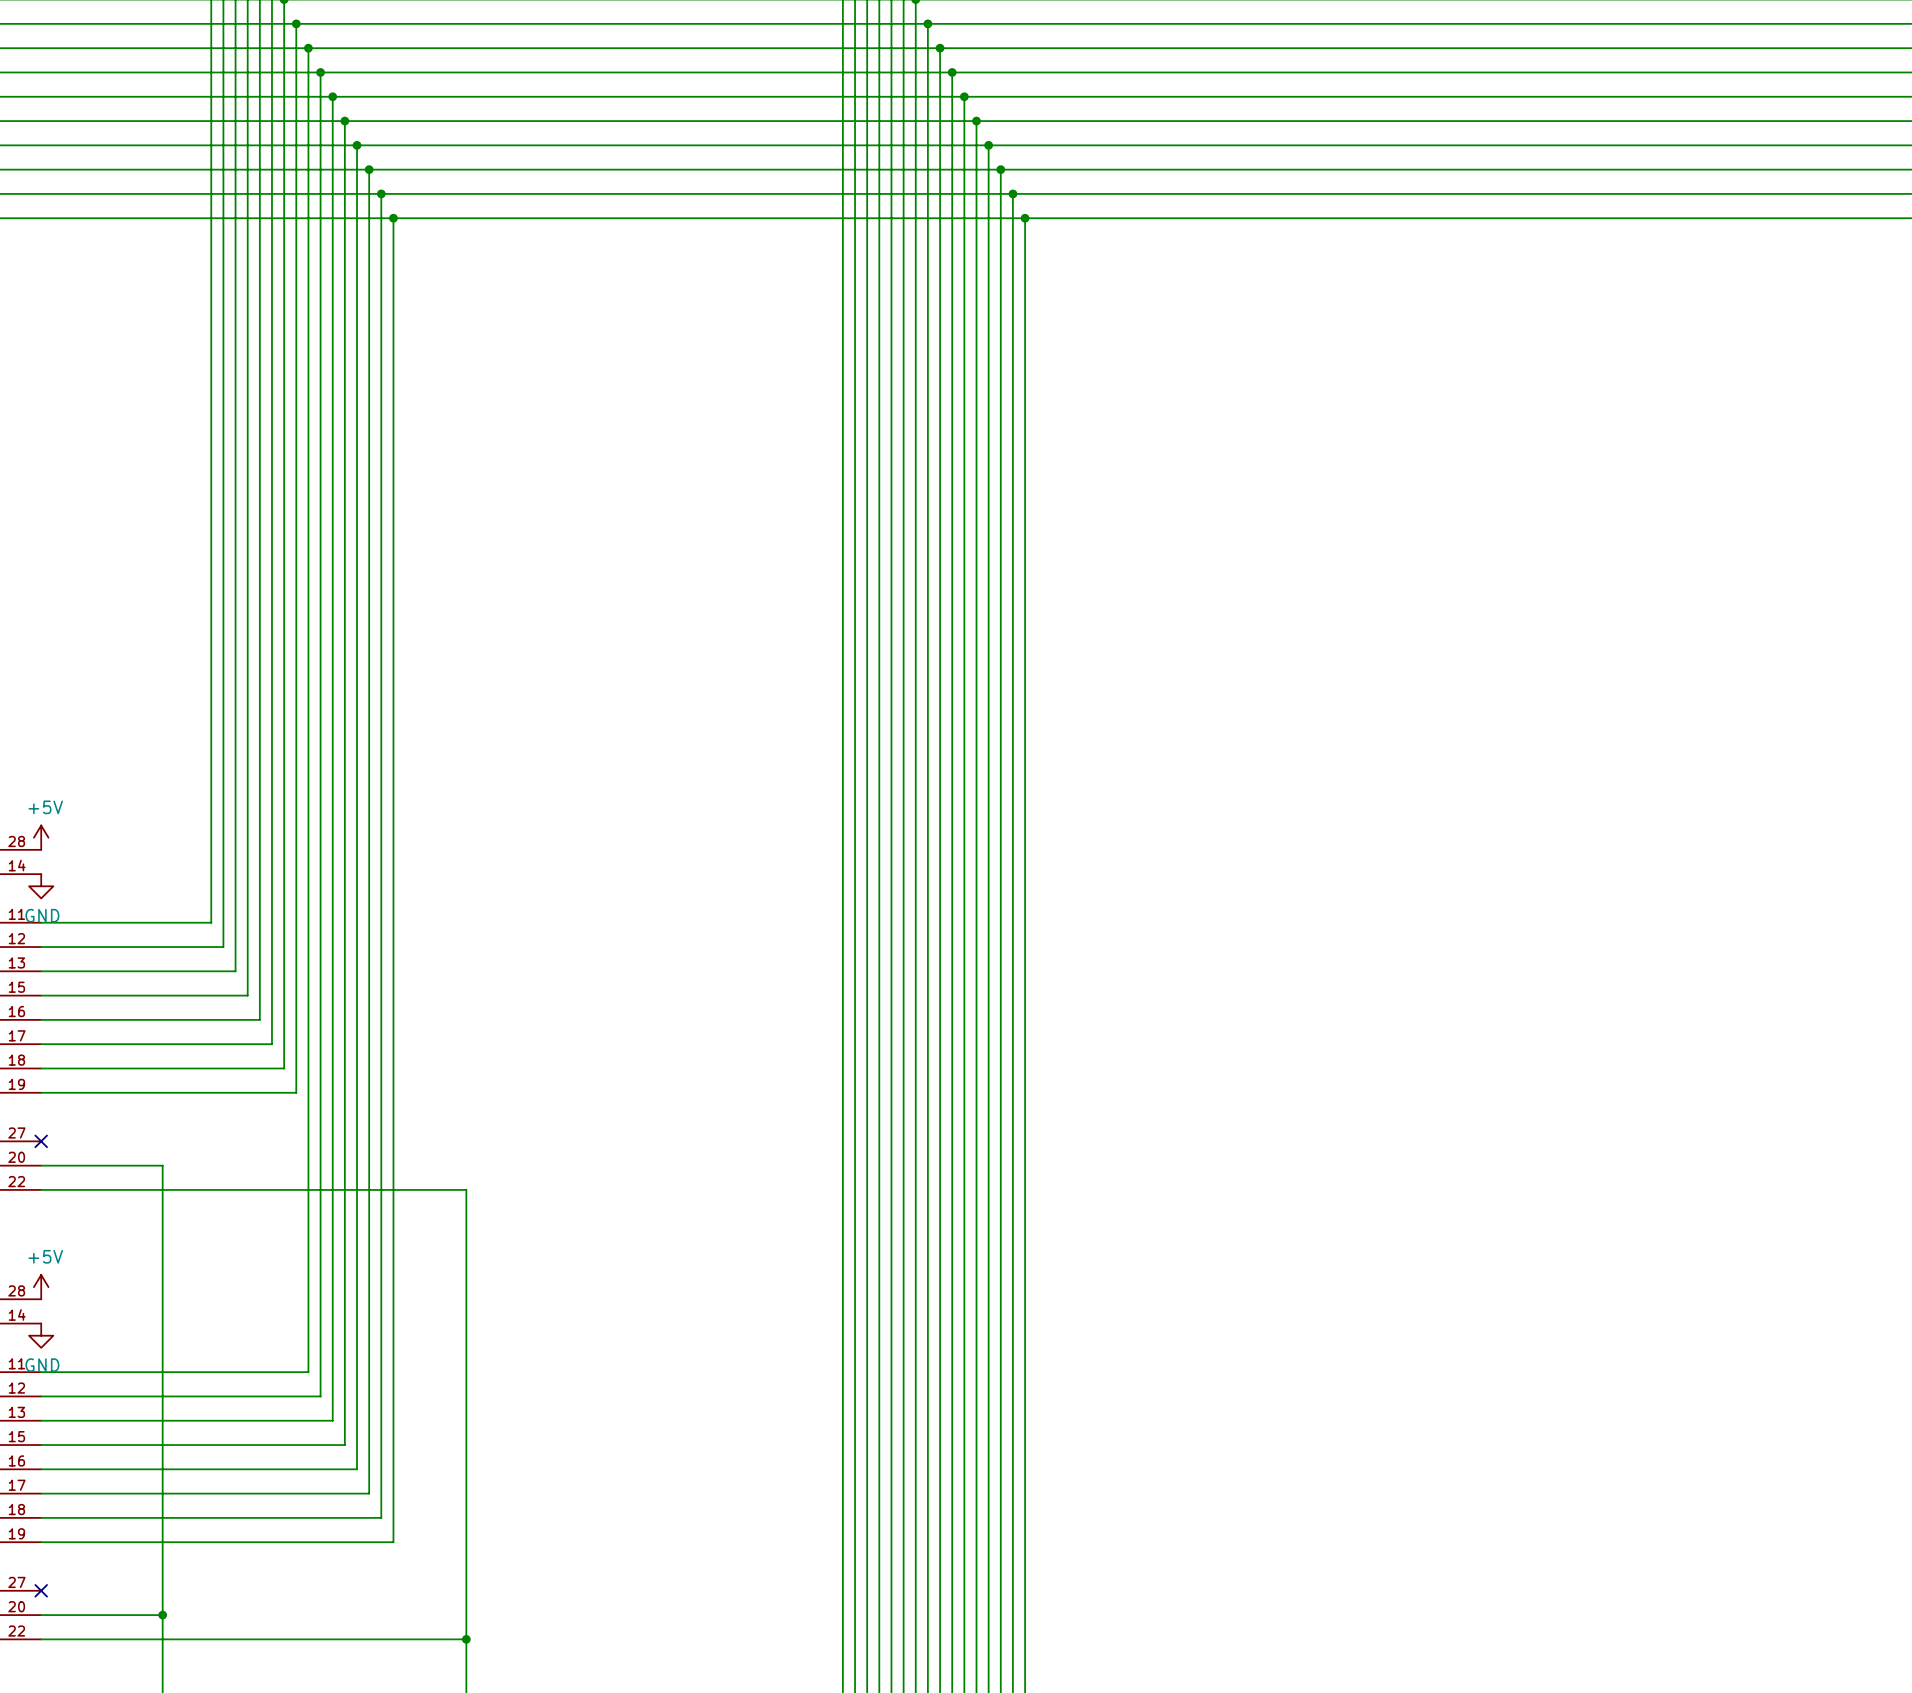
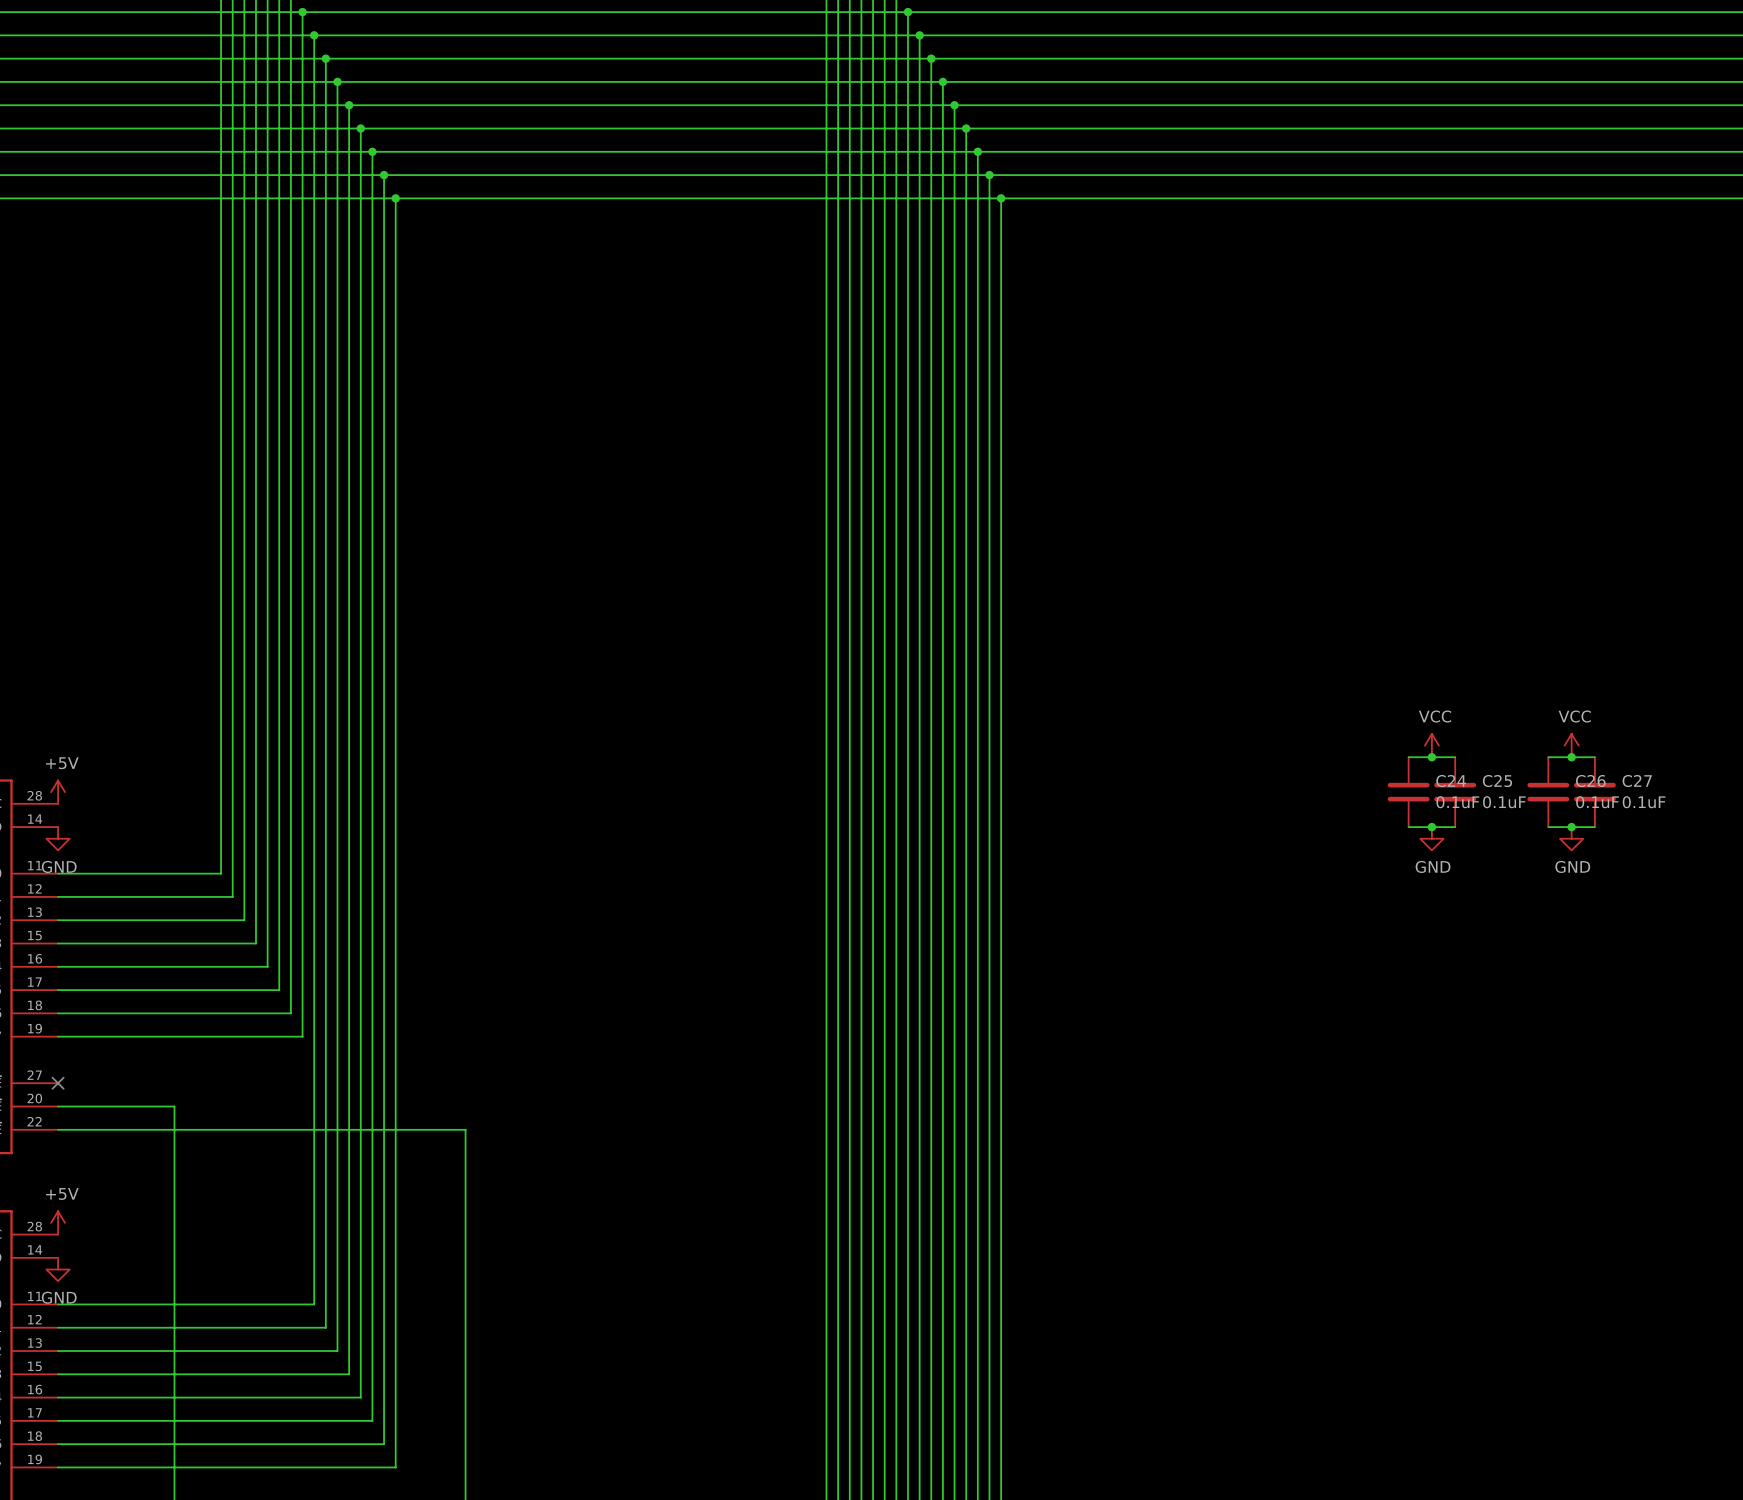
power symbol: none -> VCC (1431, 745)
power symbol: none -> VCC (1571, 745)
wire: none -> (1408, 757) (1455, 757)
junction: none -> (1431, 757)
wire: none -> (1548, 757) (1594, 757)
junction: none -> (1571, 757)
C24: none -> 0.1uF (1408, 792)
C25: none -> 0.1uF (1455, 792)
C26: none -> 0.1uF (1548, 792)
C27: none -> 0.1uF (1594, 792)
wire: none -> (1408, 827) (1455, 827)
junction: none -> (1431, 827)
wire: none -> (1548, 827) (1594, 827)
junction: none -> (1571, 827)
power symbol: none -> GND (1431, 838)
power symbol: none -> GND (1571, 838)

